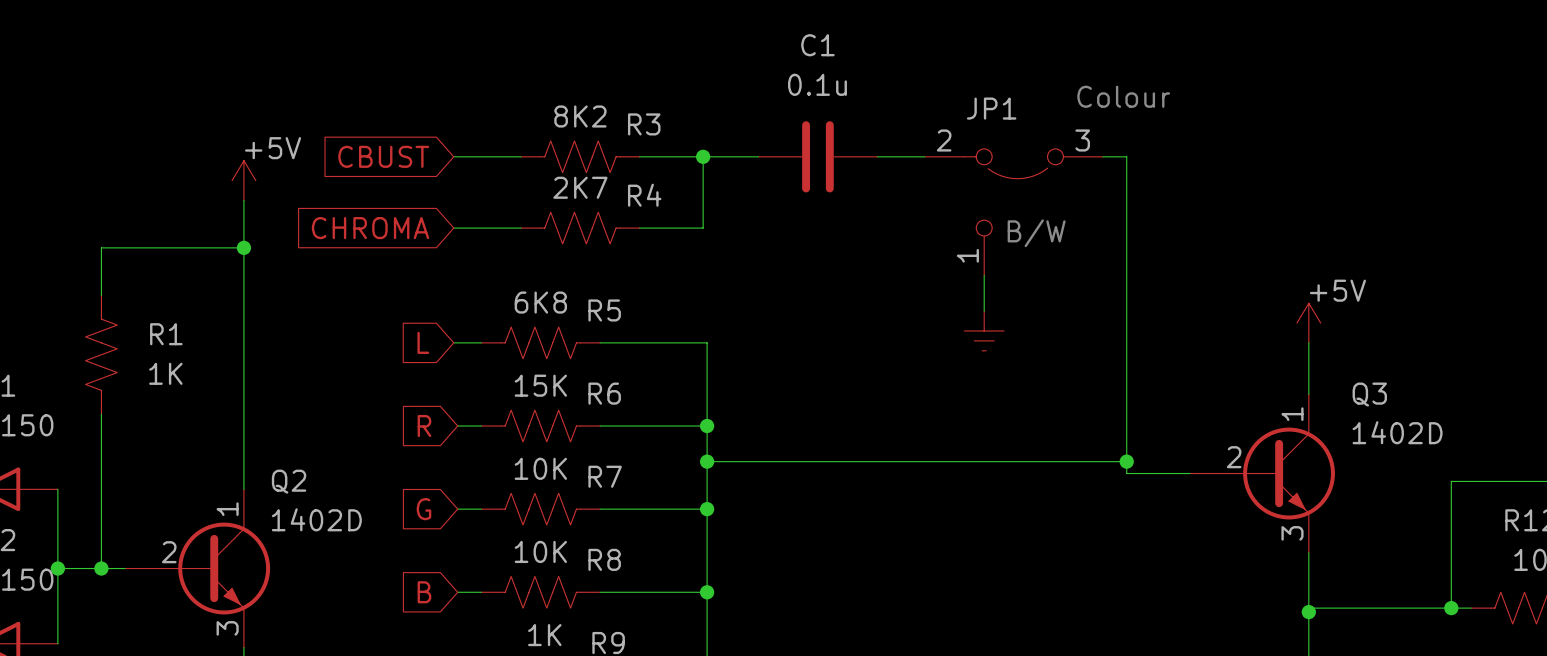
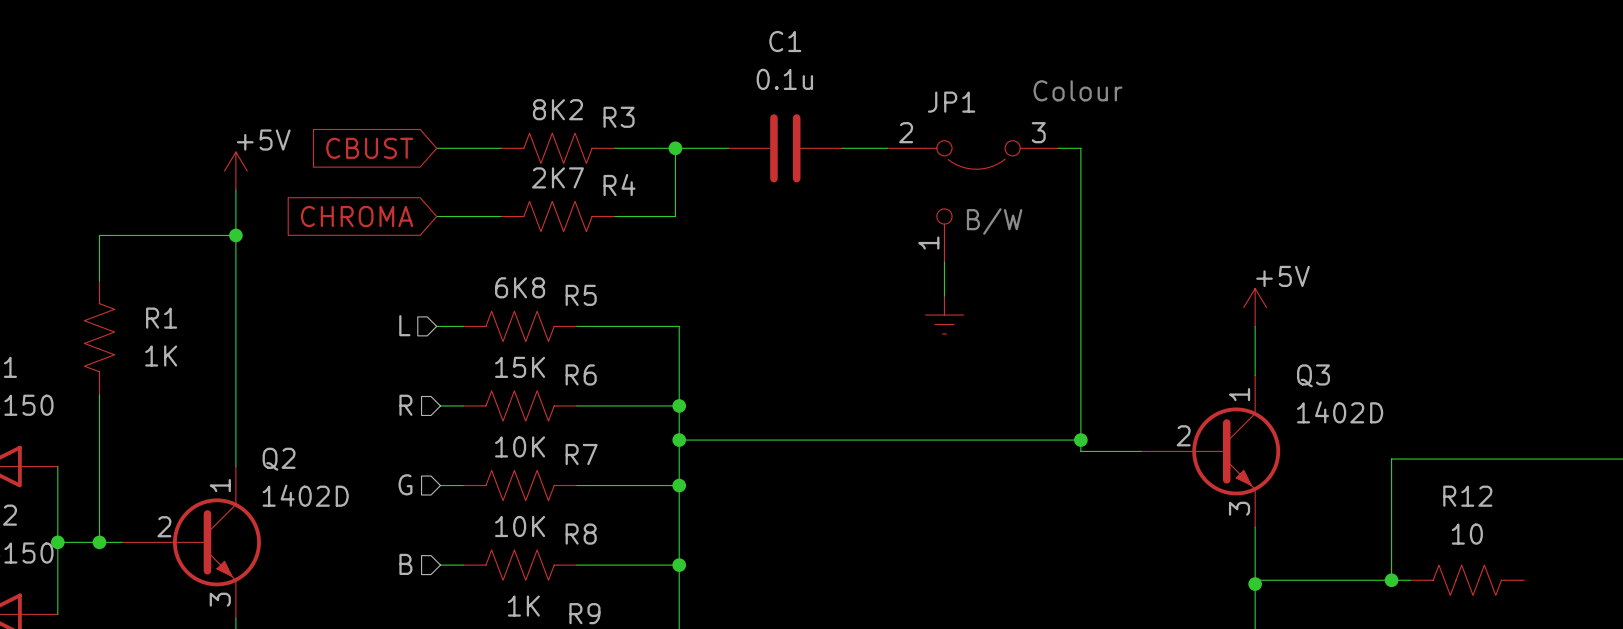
hierarchical label: none -> L (404, 325)
global label: L (423, 342) -> none
hierarchical label: none -> R (405, 405)
global label: R (424, 426) -> none
hierarchical label: none -> G (405, 484)
global label: G (423, 509) -> none
hierarchical label: none -> B (405, 564)
global label: B (424, 592) -> none

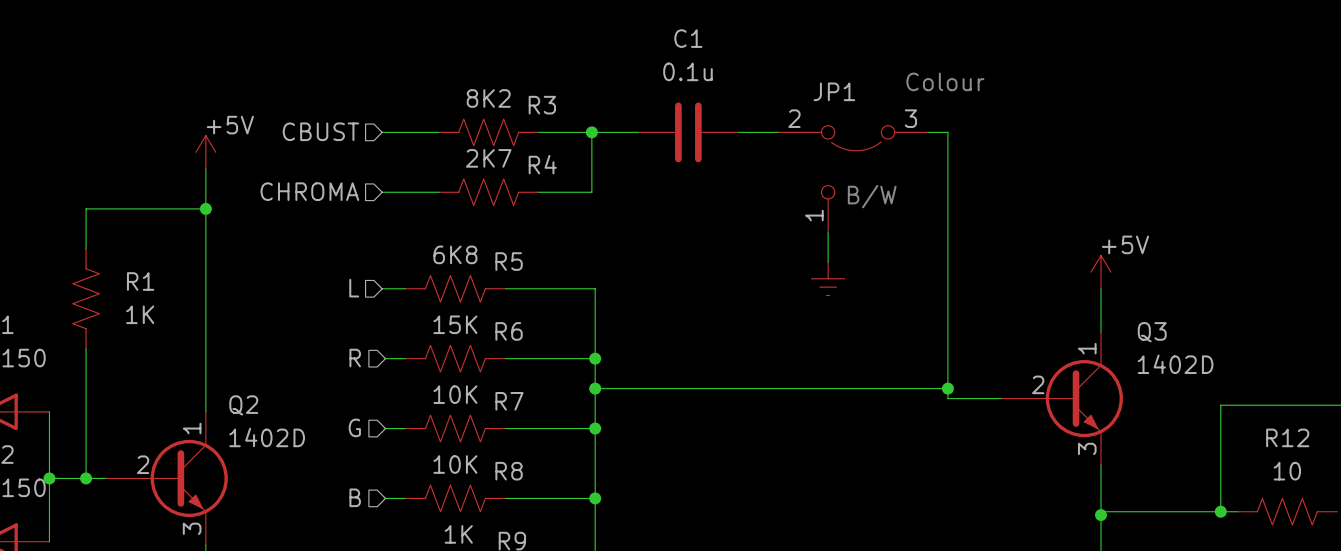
hierarchical label: none -> CBUST (320, 131)
global label: CBUST (369, 148) -> none
hierarchical label: none -> CHROMA (309, 191)
global label: CHROMA (357, 216) -> none

